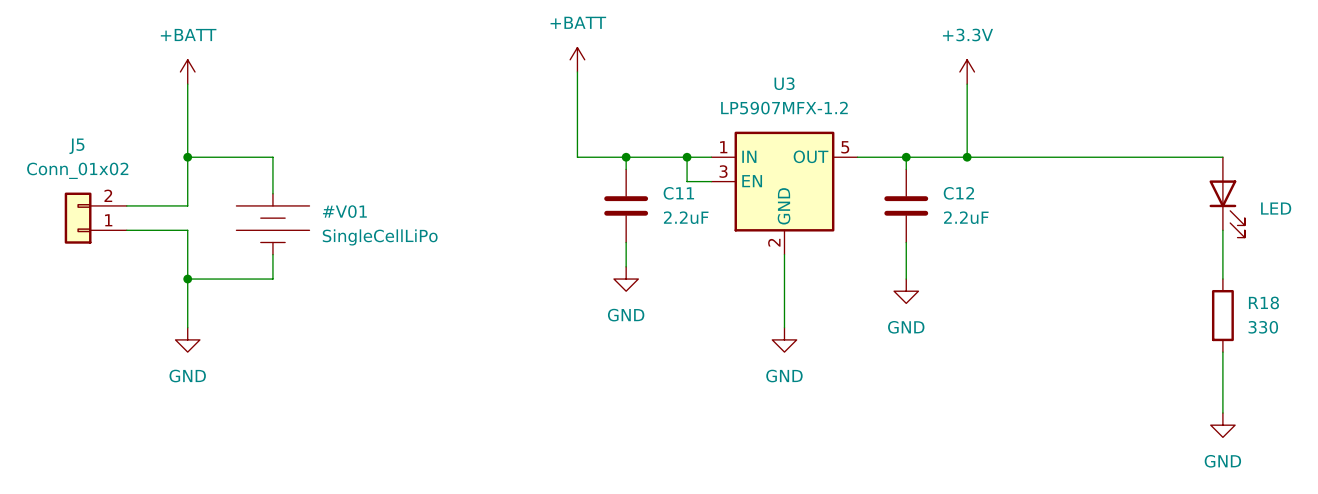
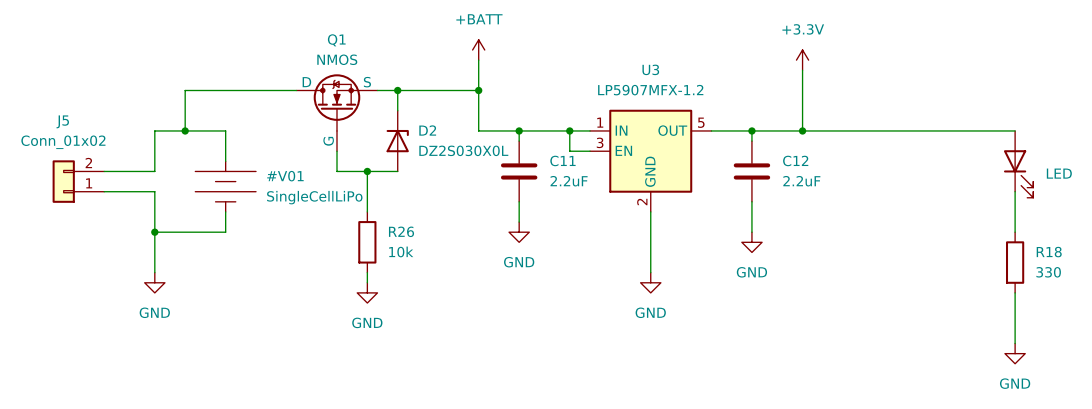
power symbol: +BATT (187, 71) -> none
wire: (187, 84) (187, 157) -> none
wire: none -> (296, 90) (185, 90) (185, 130)
wire: none -> (377, 90) (478, 90)
wire: none -> (397, 90) (397, 110)
junction: none -> (397, 90)
junction: none -> (478, 90)
Q1: none -> NMOS (336, 112)
junction position: (187, 157) -> (185, 130)
D2: none -> DZ2S030X0L (397, 141)
wire: none -> (336, 151) (336, 171) (397, 171)
wire: none -> (367, 171) (367, 211)
junction: none -> (367, 171)
R26: none -> 10k (367, 242)
wire: none -> (367, 272) (367, 282)
power symbol: none -> GND (367, 292)

